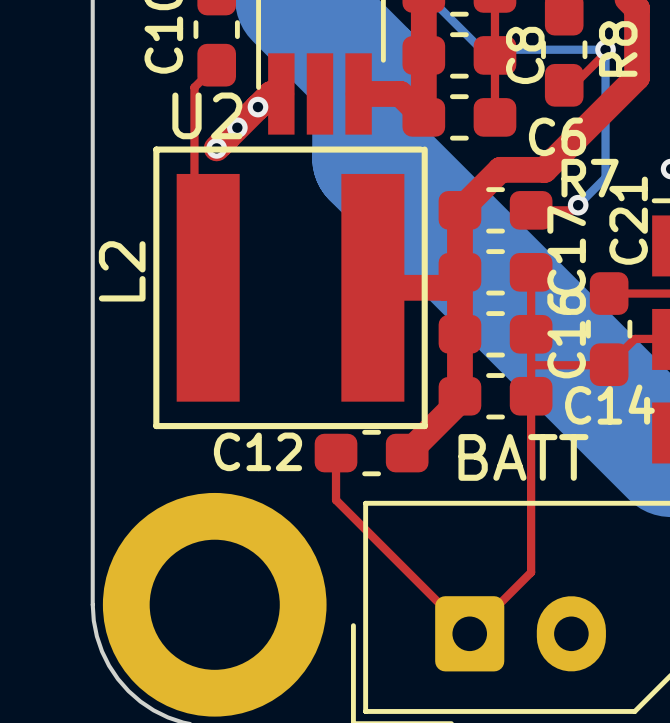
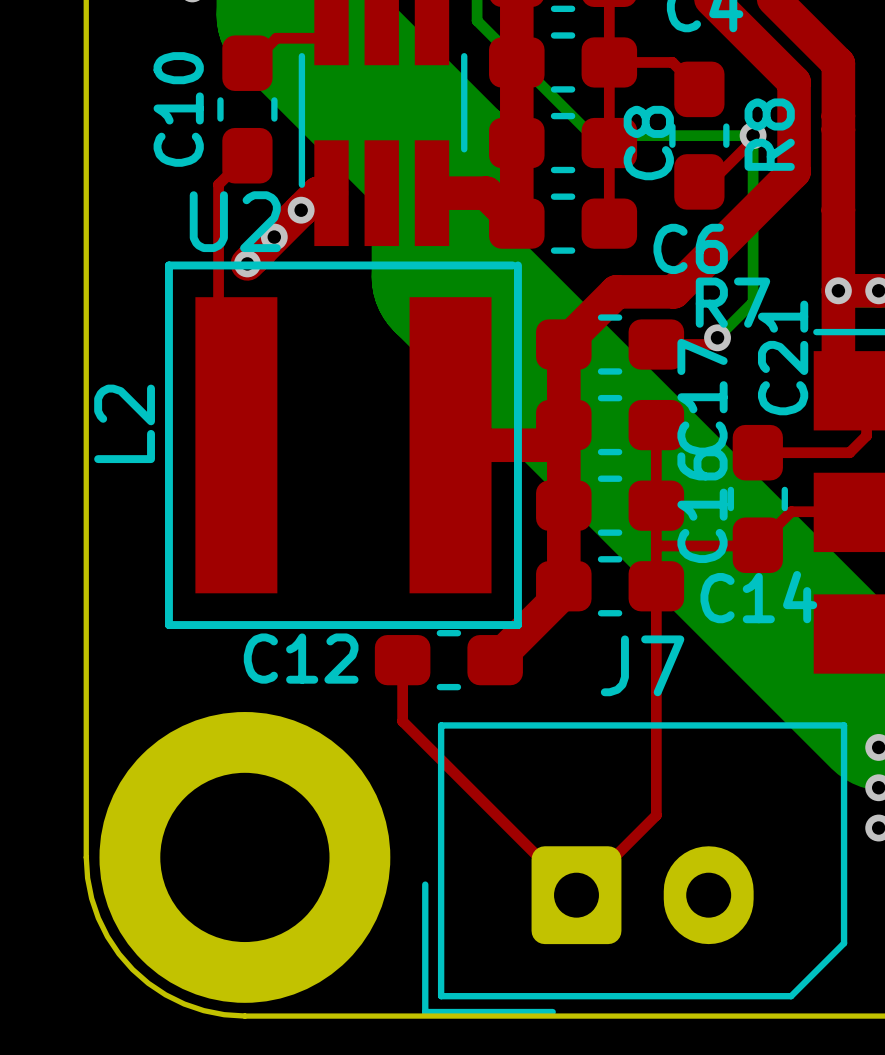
BATT name: BATT (523, 457) -> J7 (642, 665)

